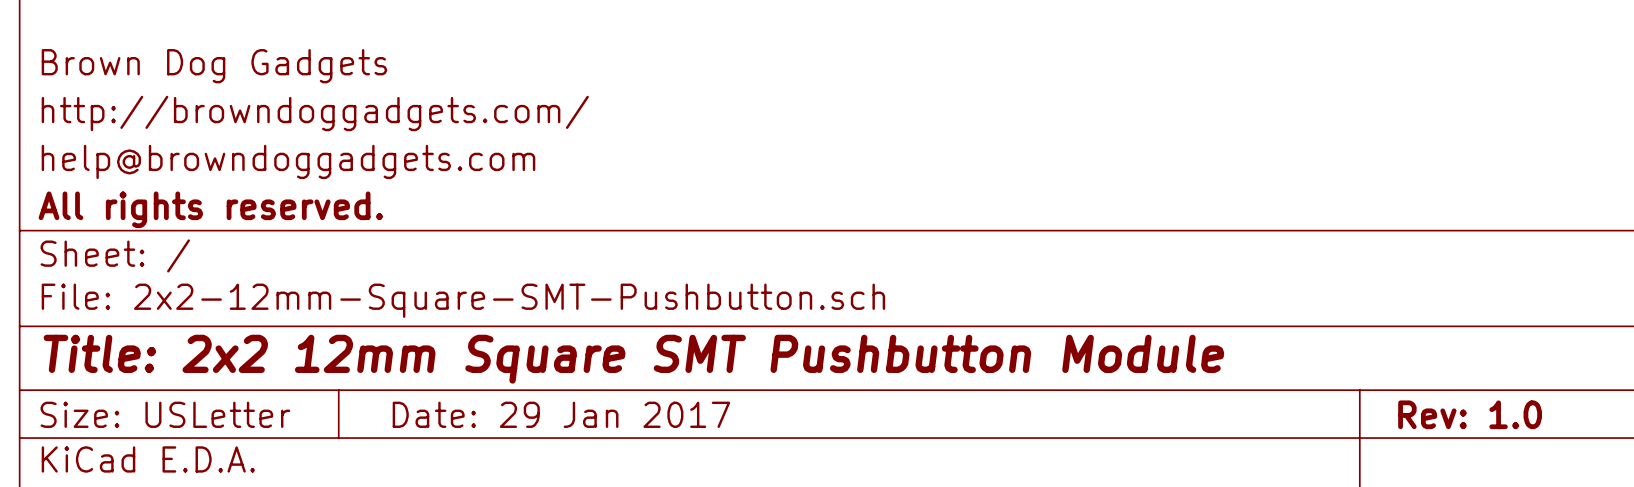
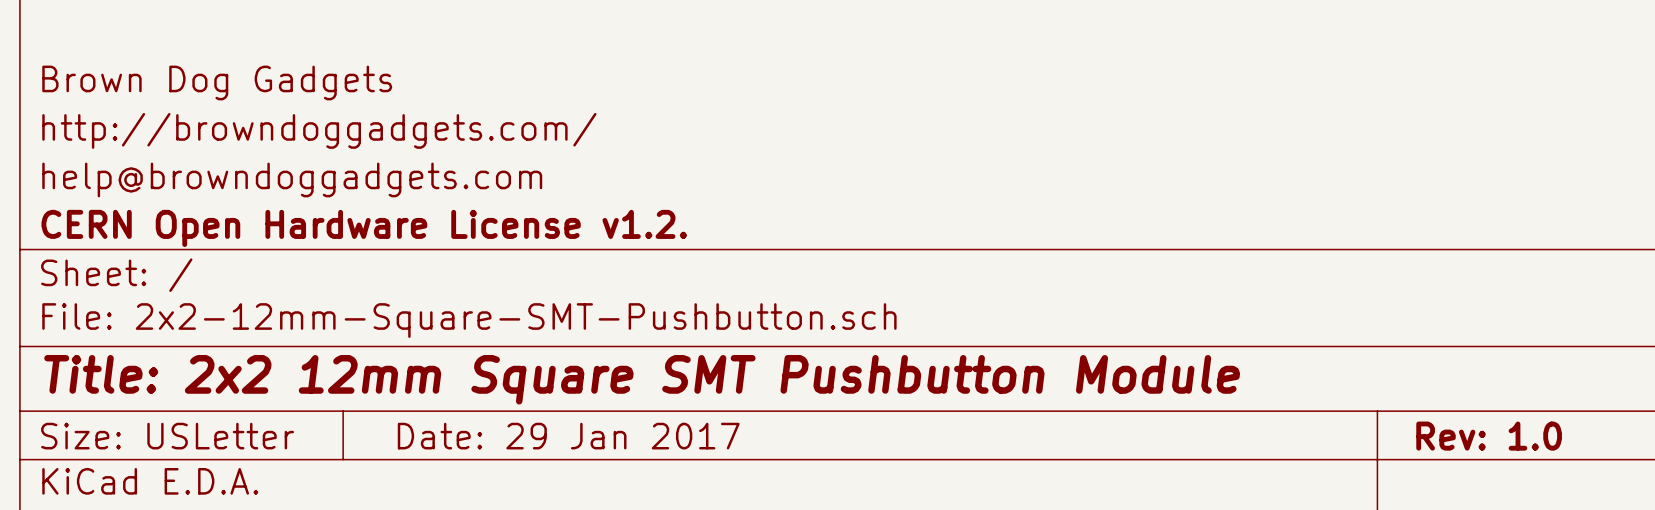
title block: All rights reserved. (210, 209) -> CERN Open Hardware License v1.2. (364, 228)

